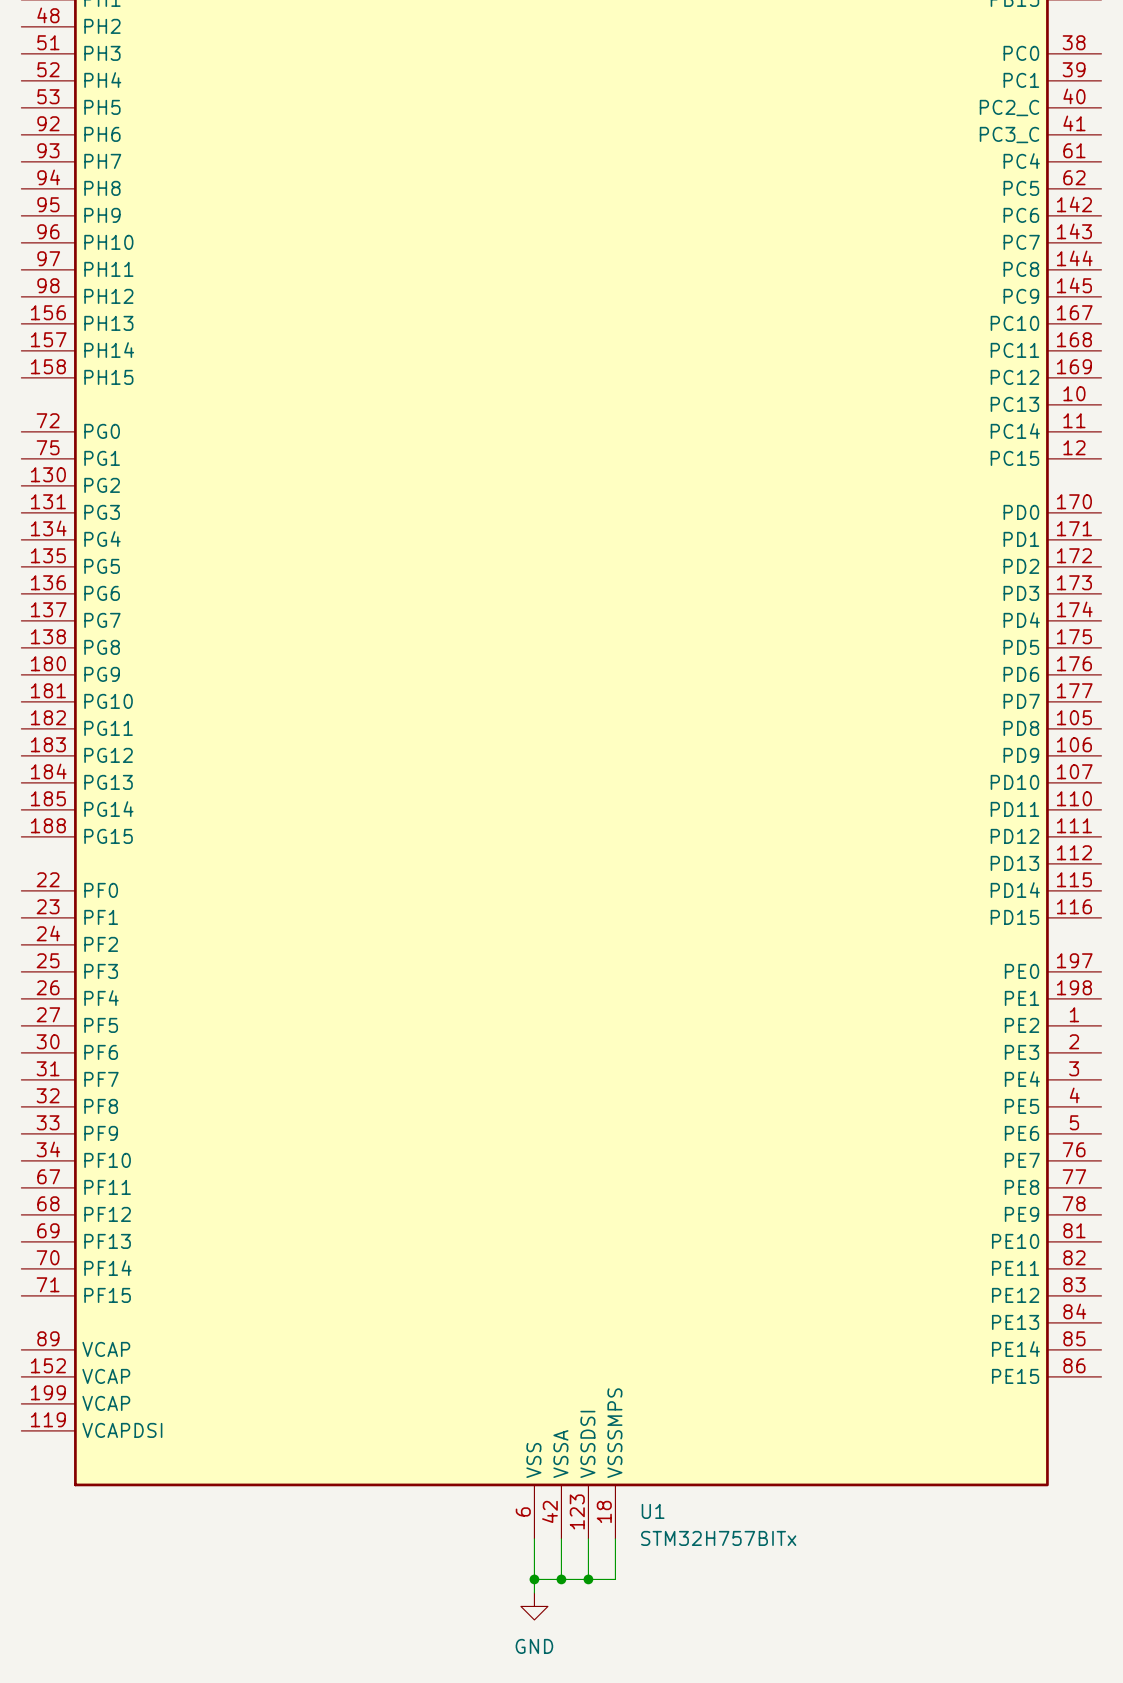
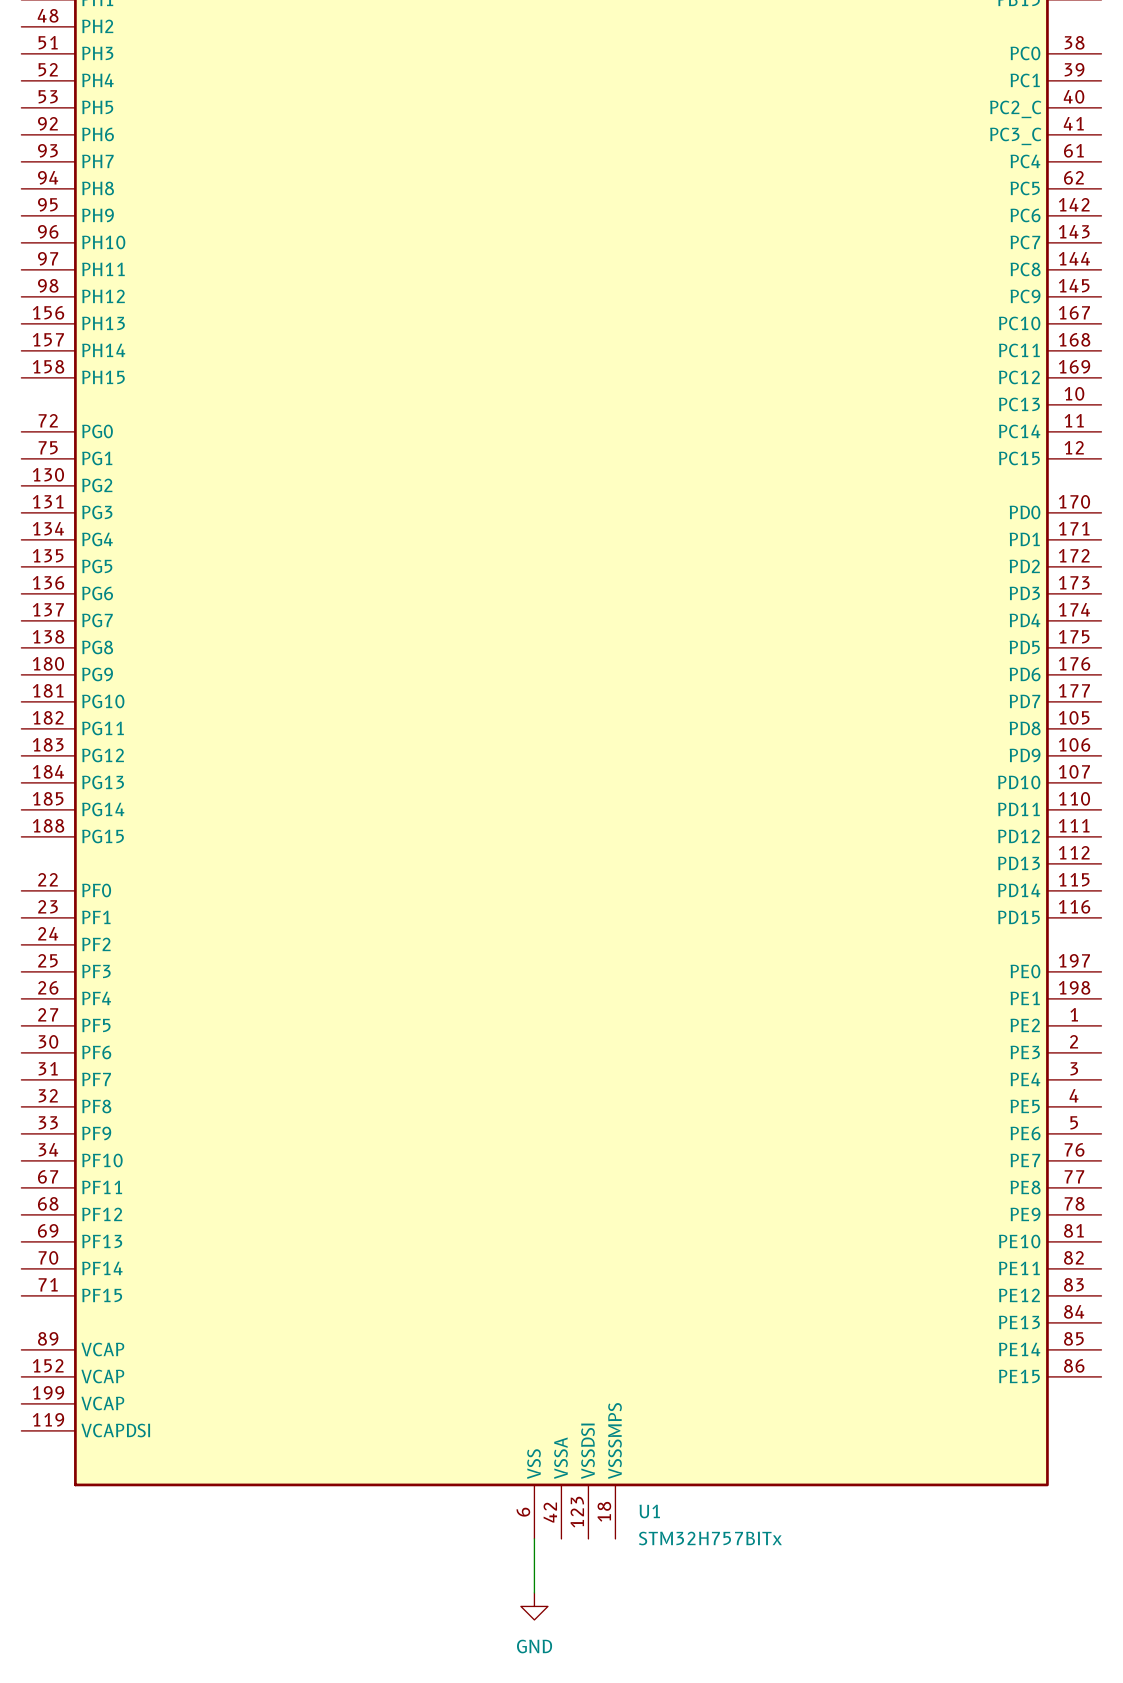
wire: (561, 1538) (561, 1579) -> none
wire: (588, 1538) (588, 1579) -> none
wire: (615, 1538) (615, 1579) (534, 1579) -> none
junction: (534, 1579) -> none
junction: (561, 1579) -> none
junction: (588, 1579) -> none

